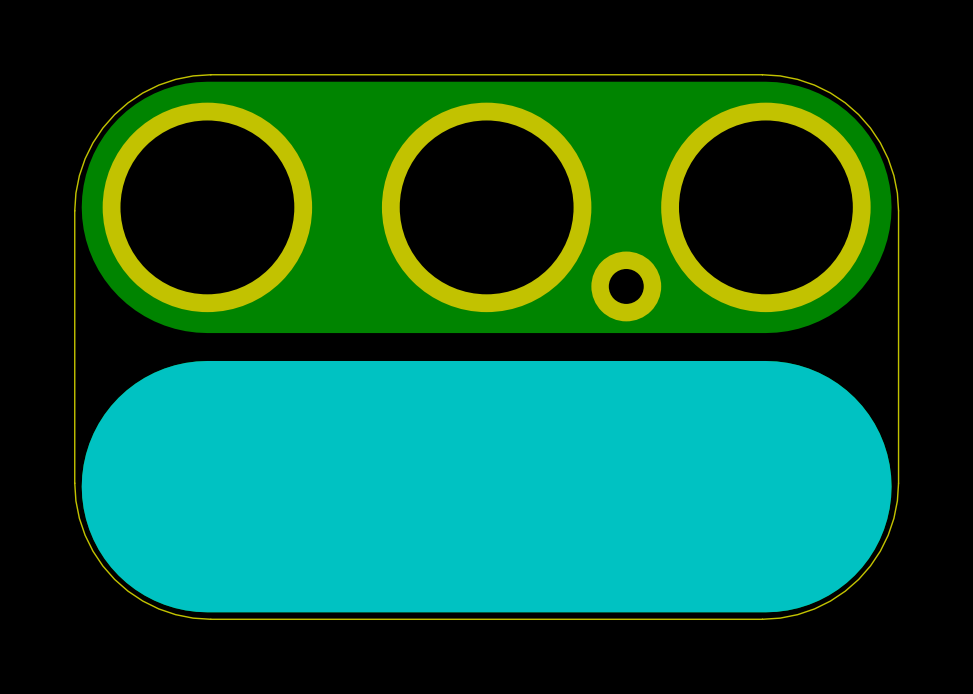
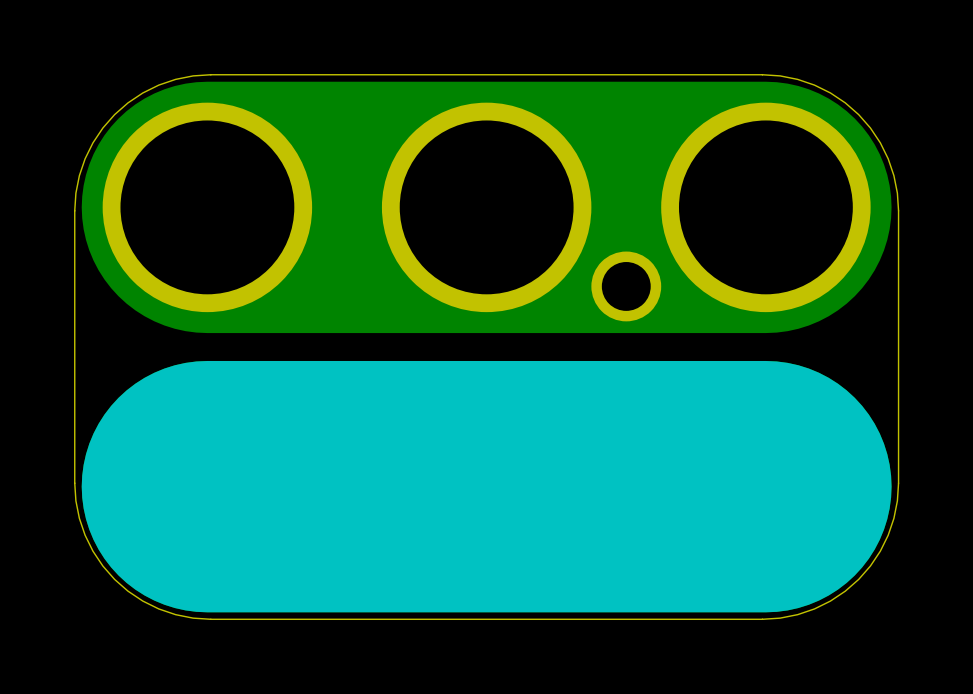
part footprint: [74, 74, 900, 621] -> [74, 74, 900, 621]

